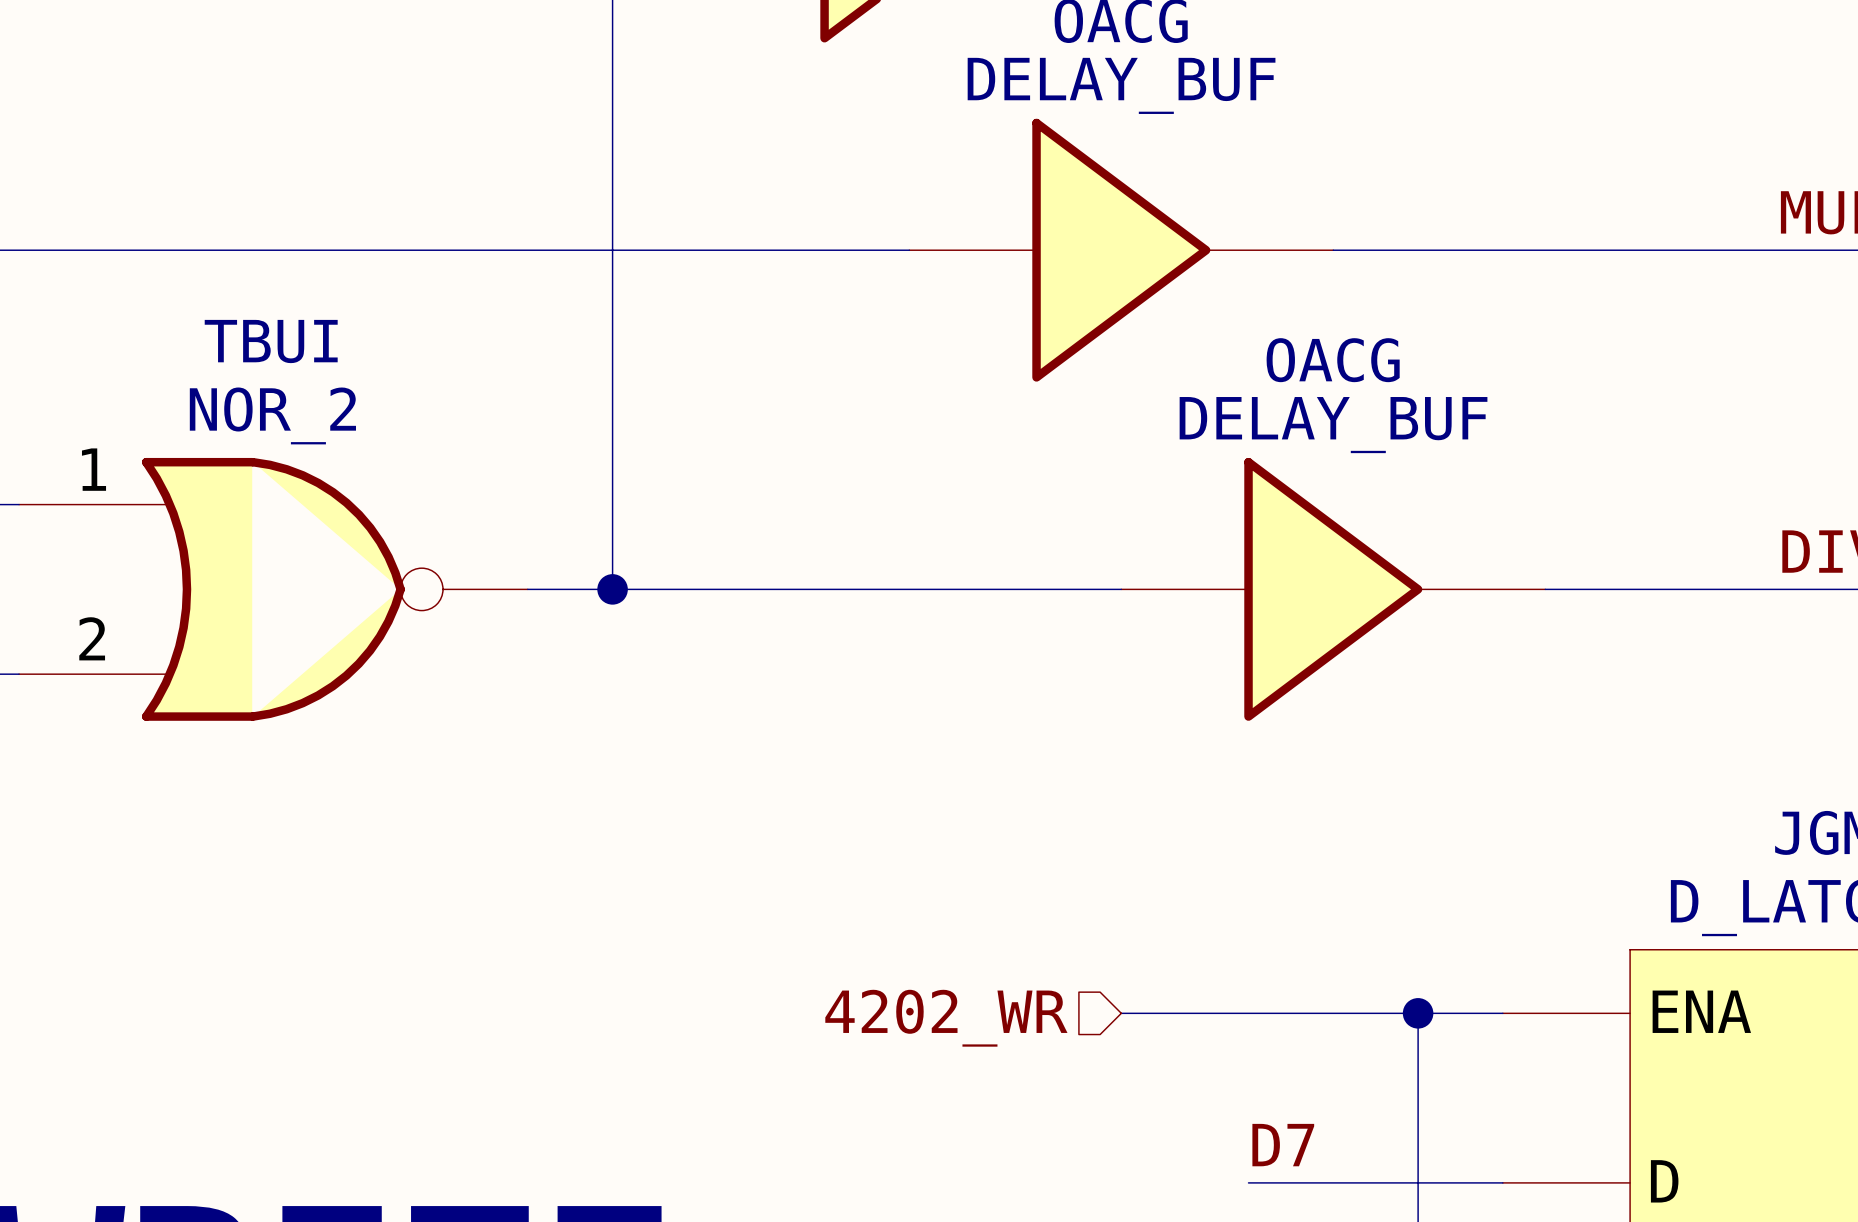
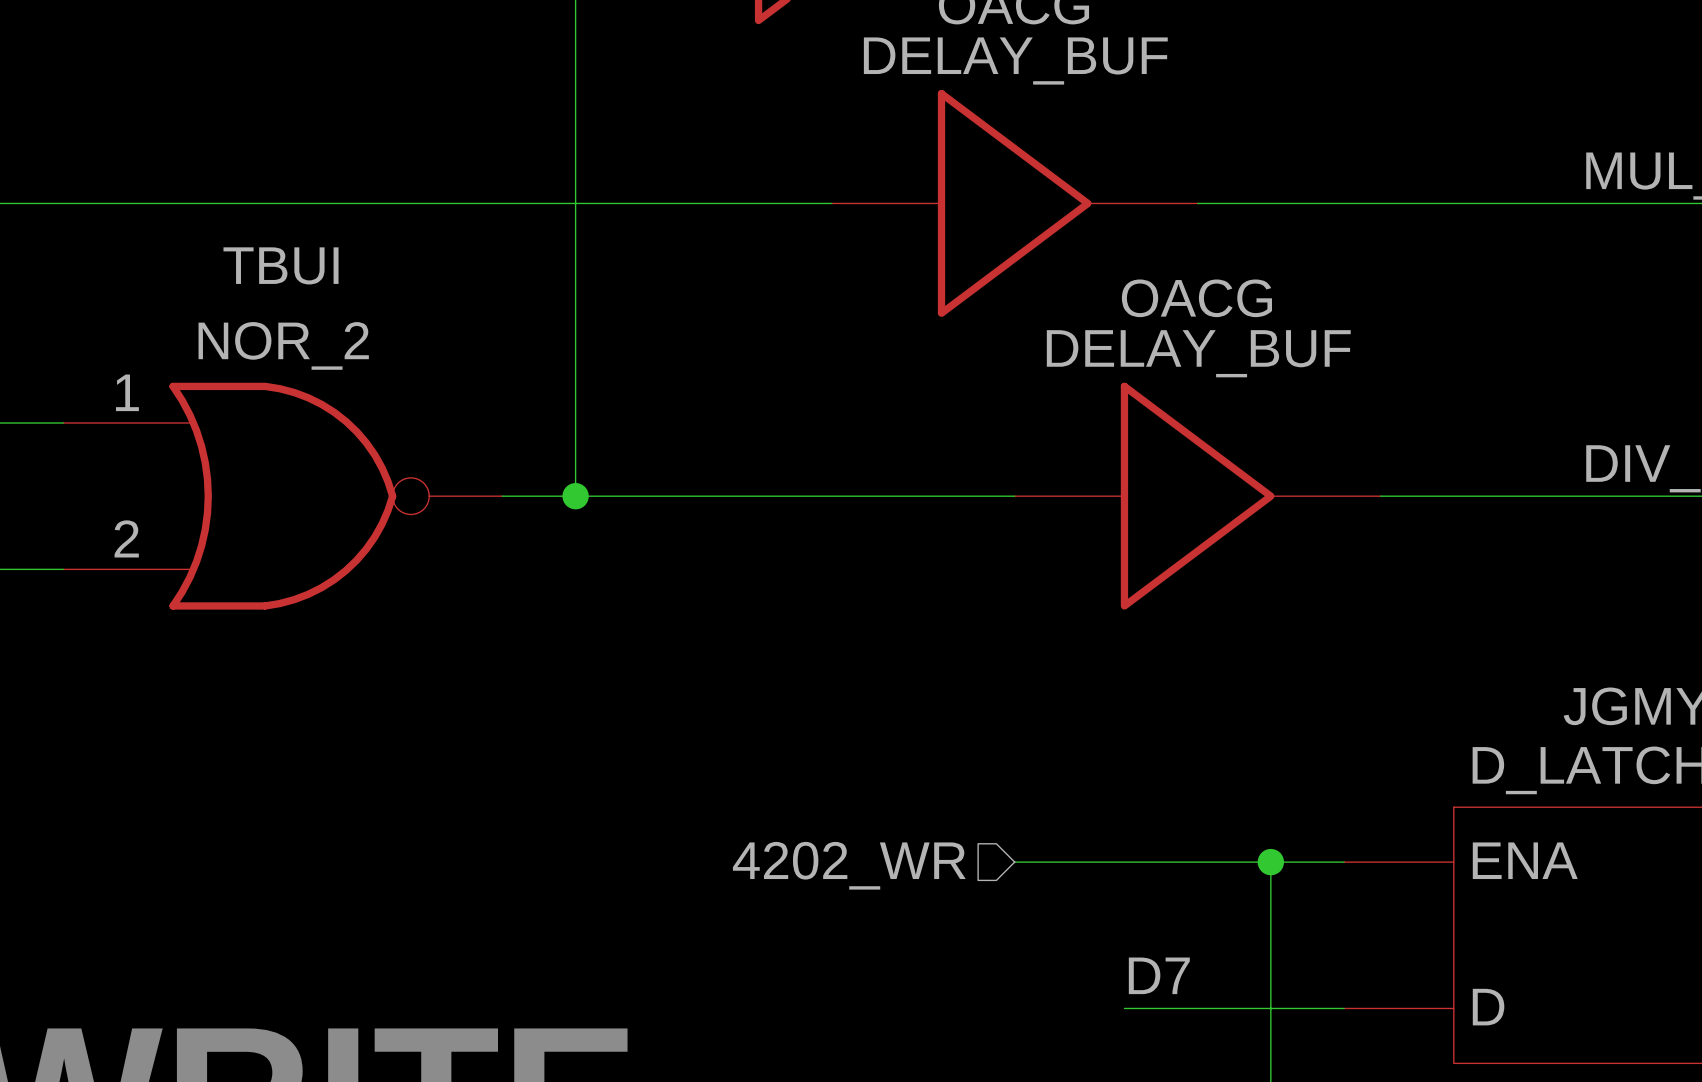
TBUI name position: TBUI (271, 341) -> TBUI (281, 265)

